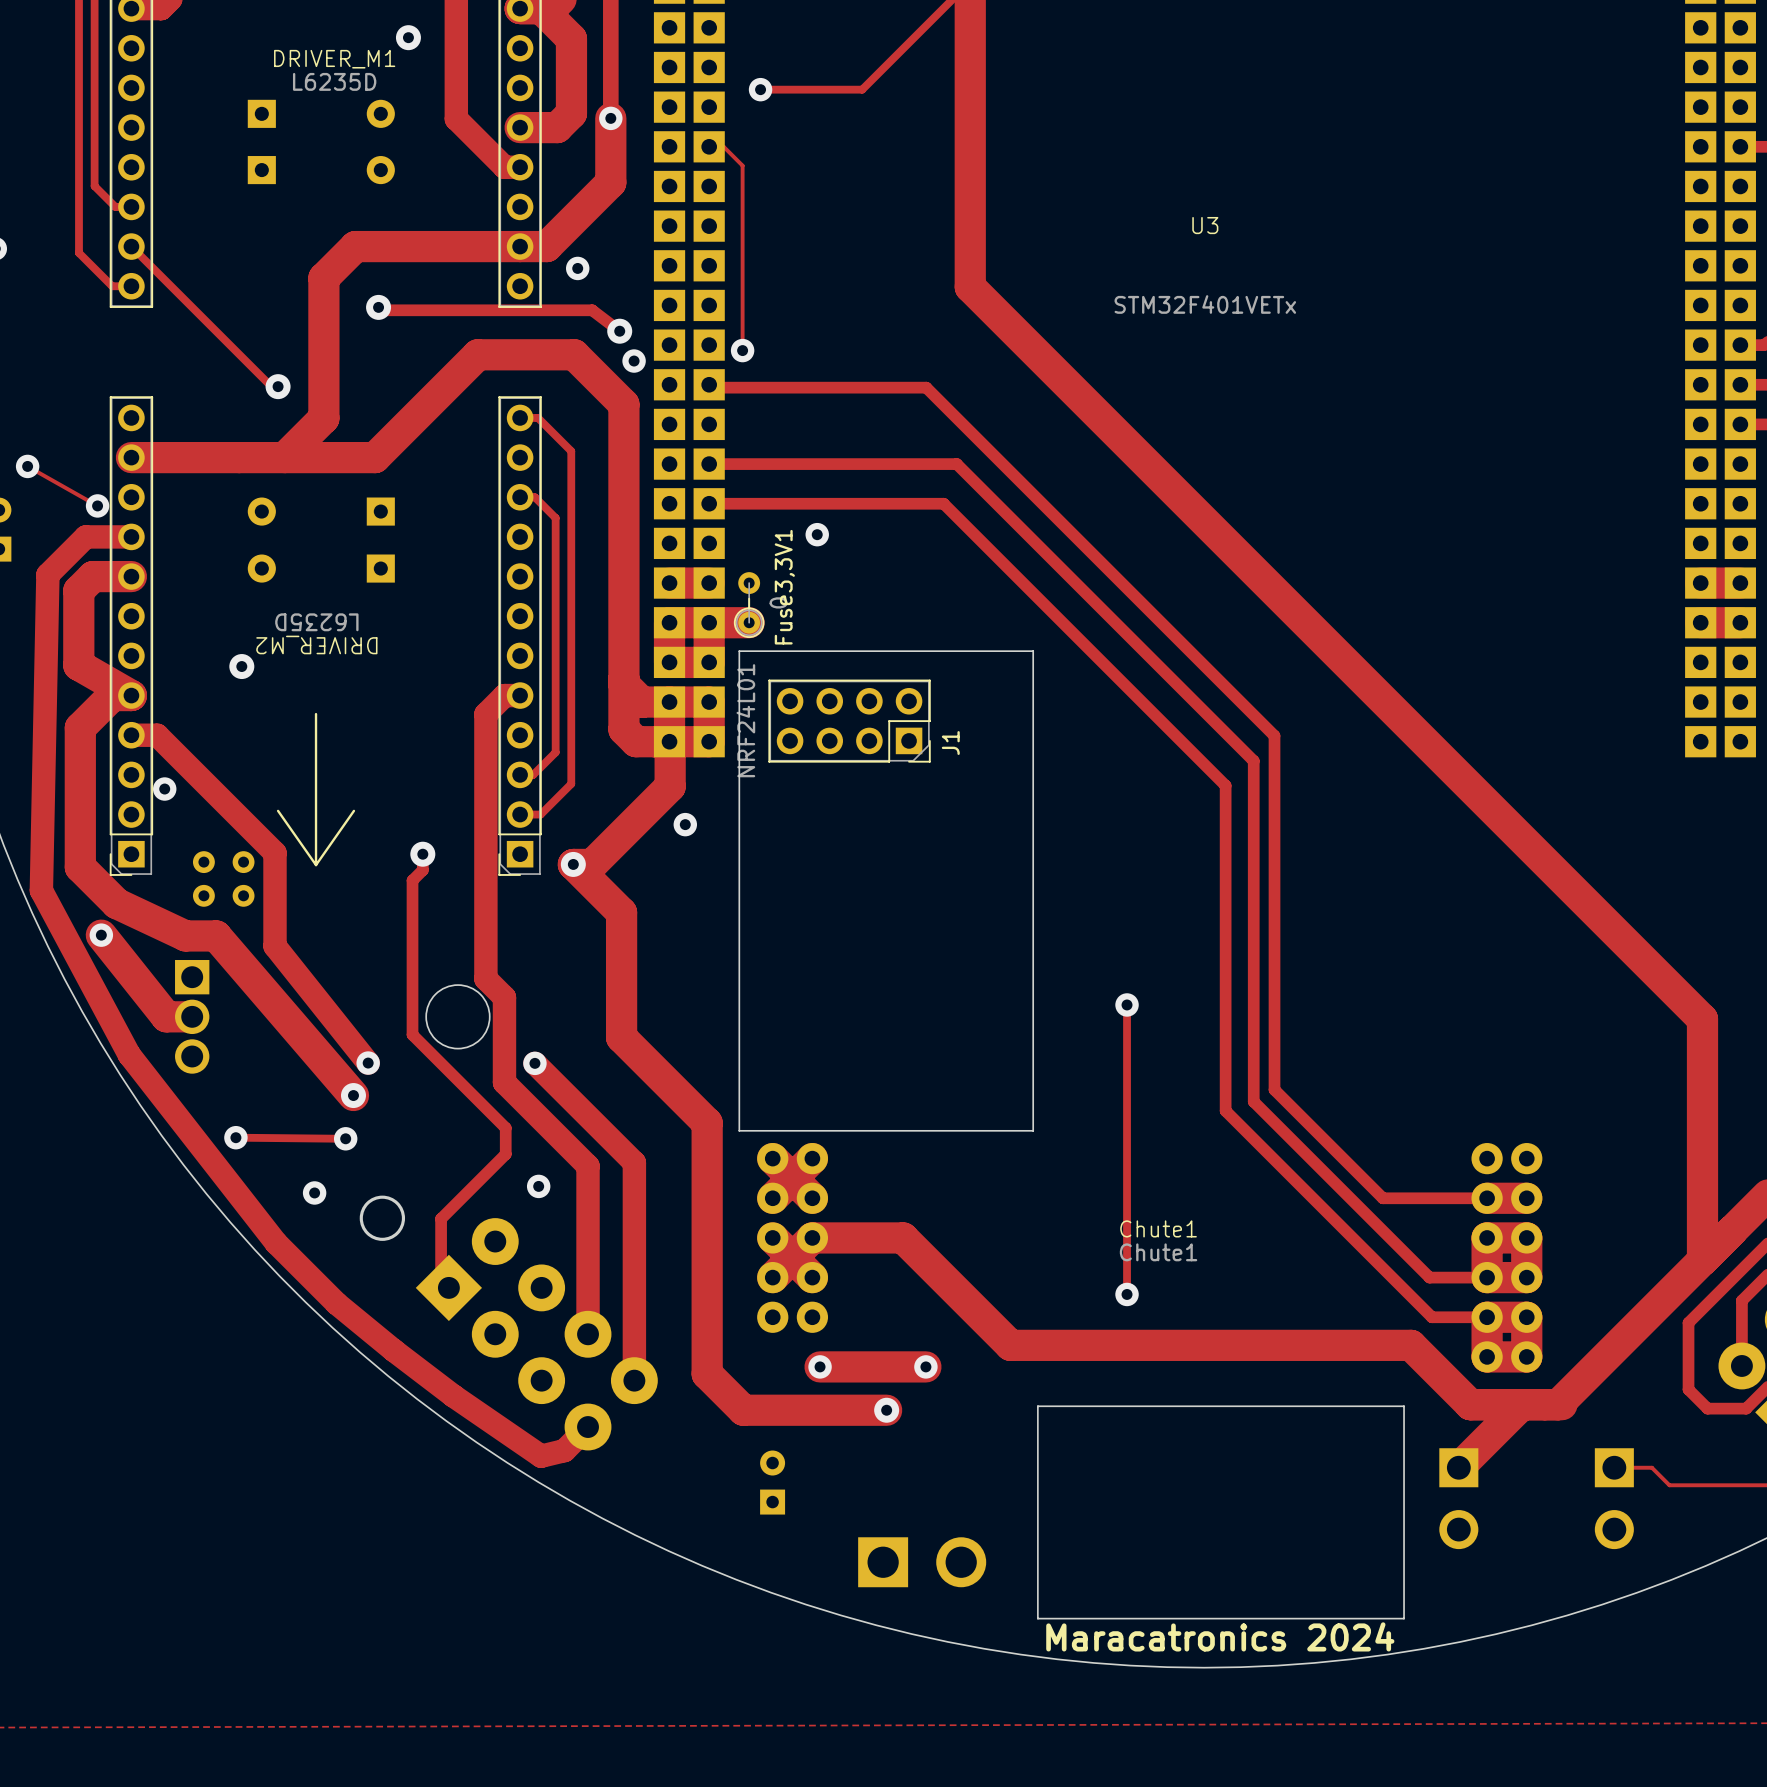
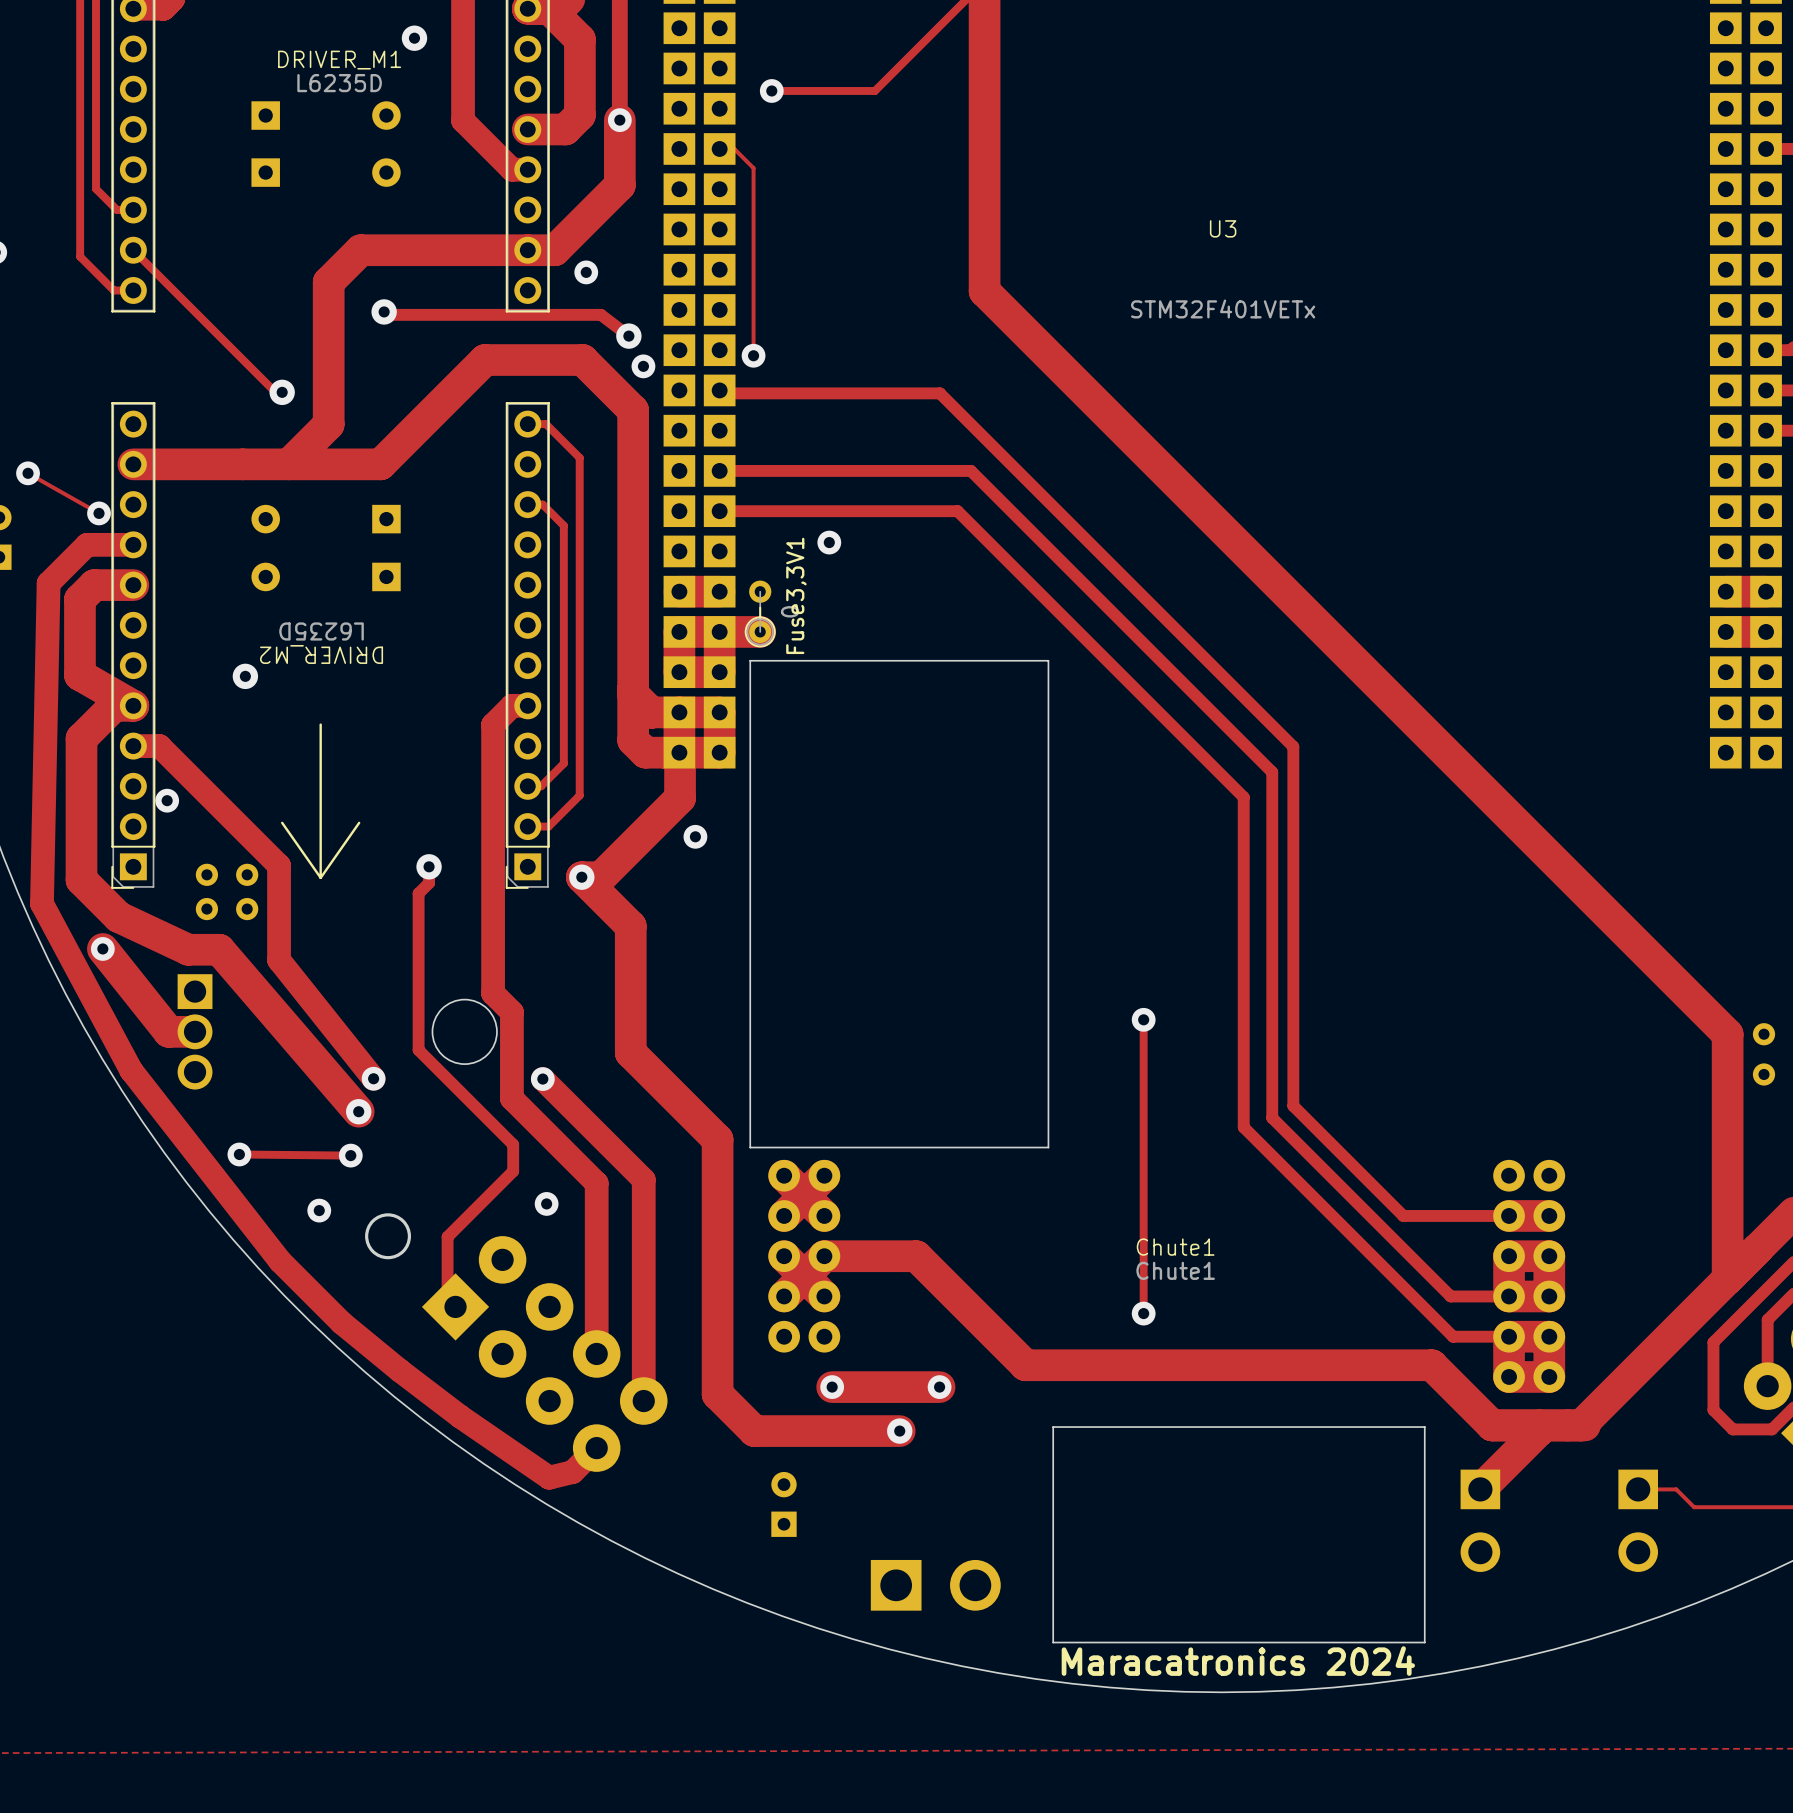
J1: NRF24L01 (849, 721) -> none
part: none -> (1764, 1054)

